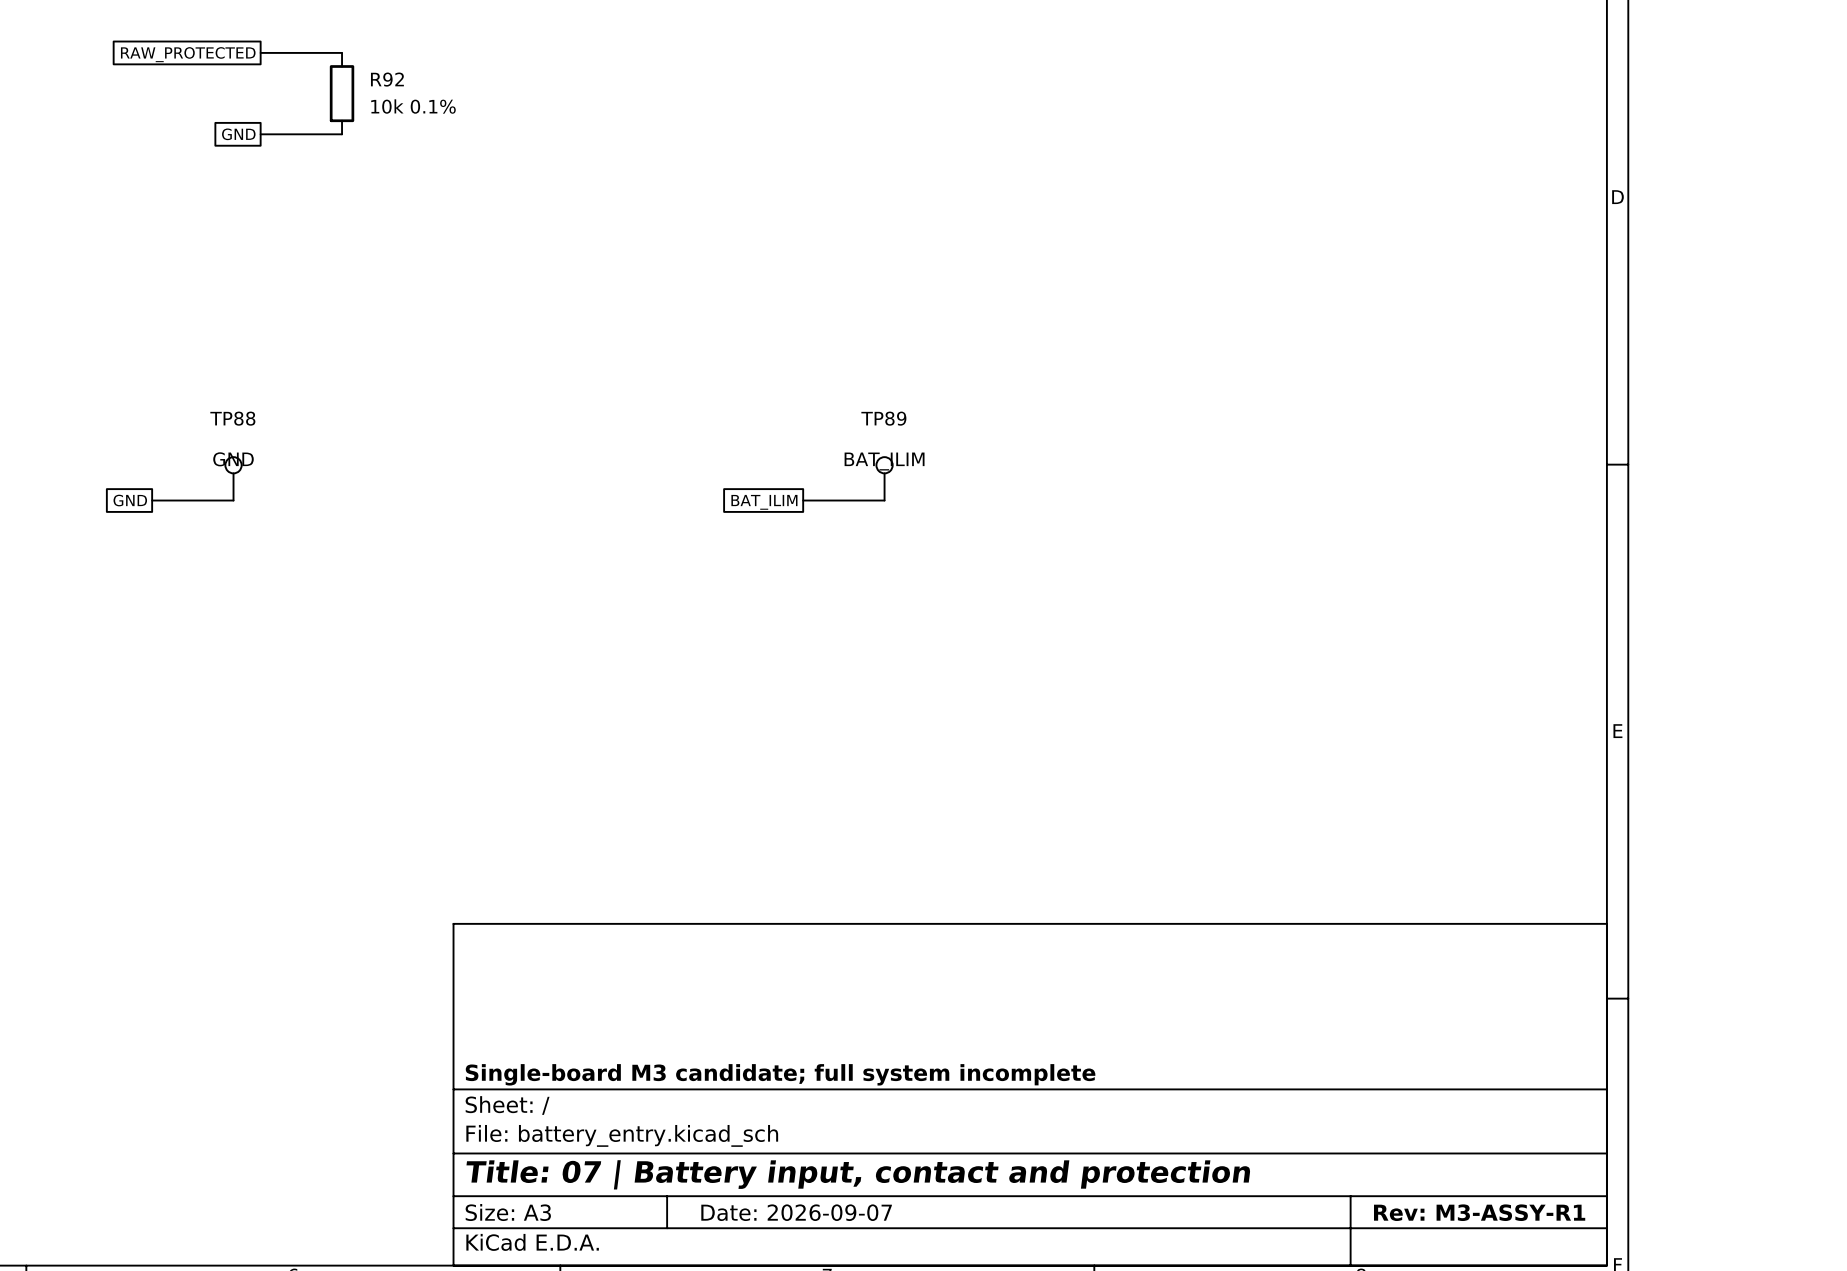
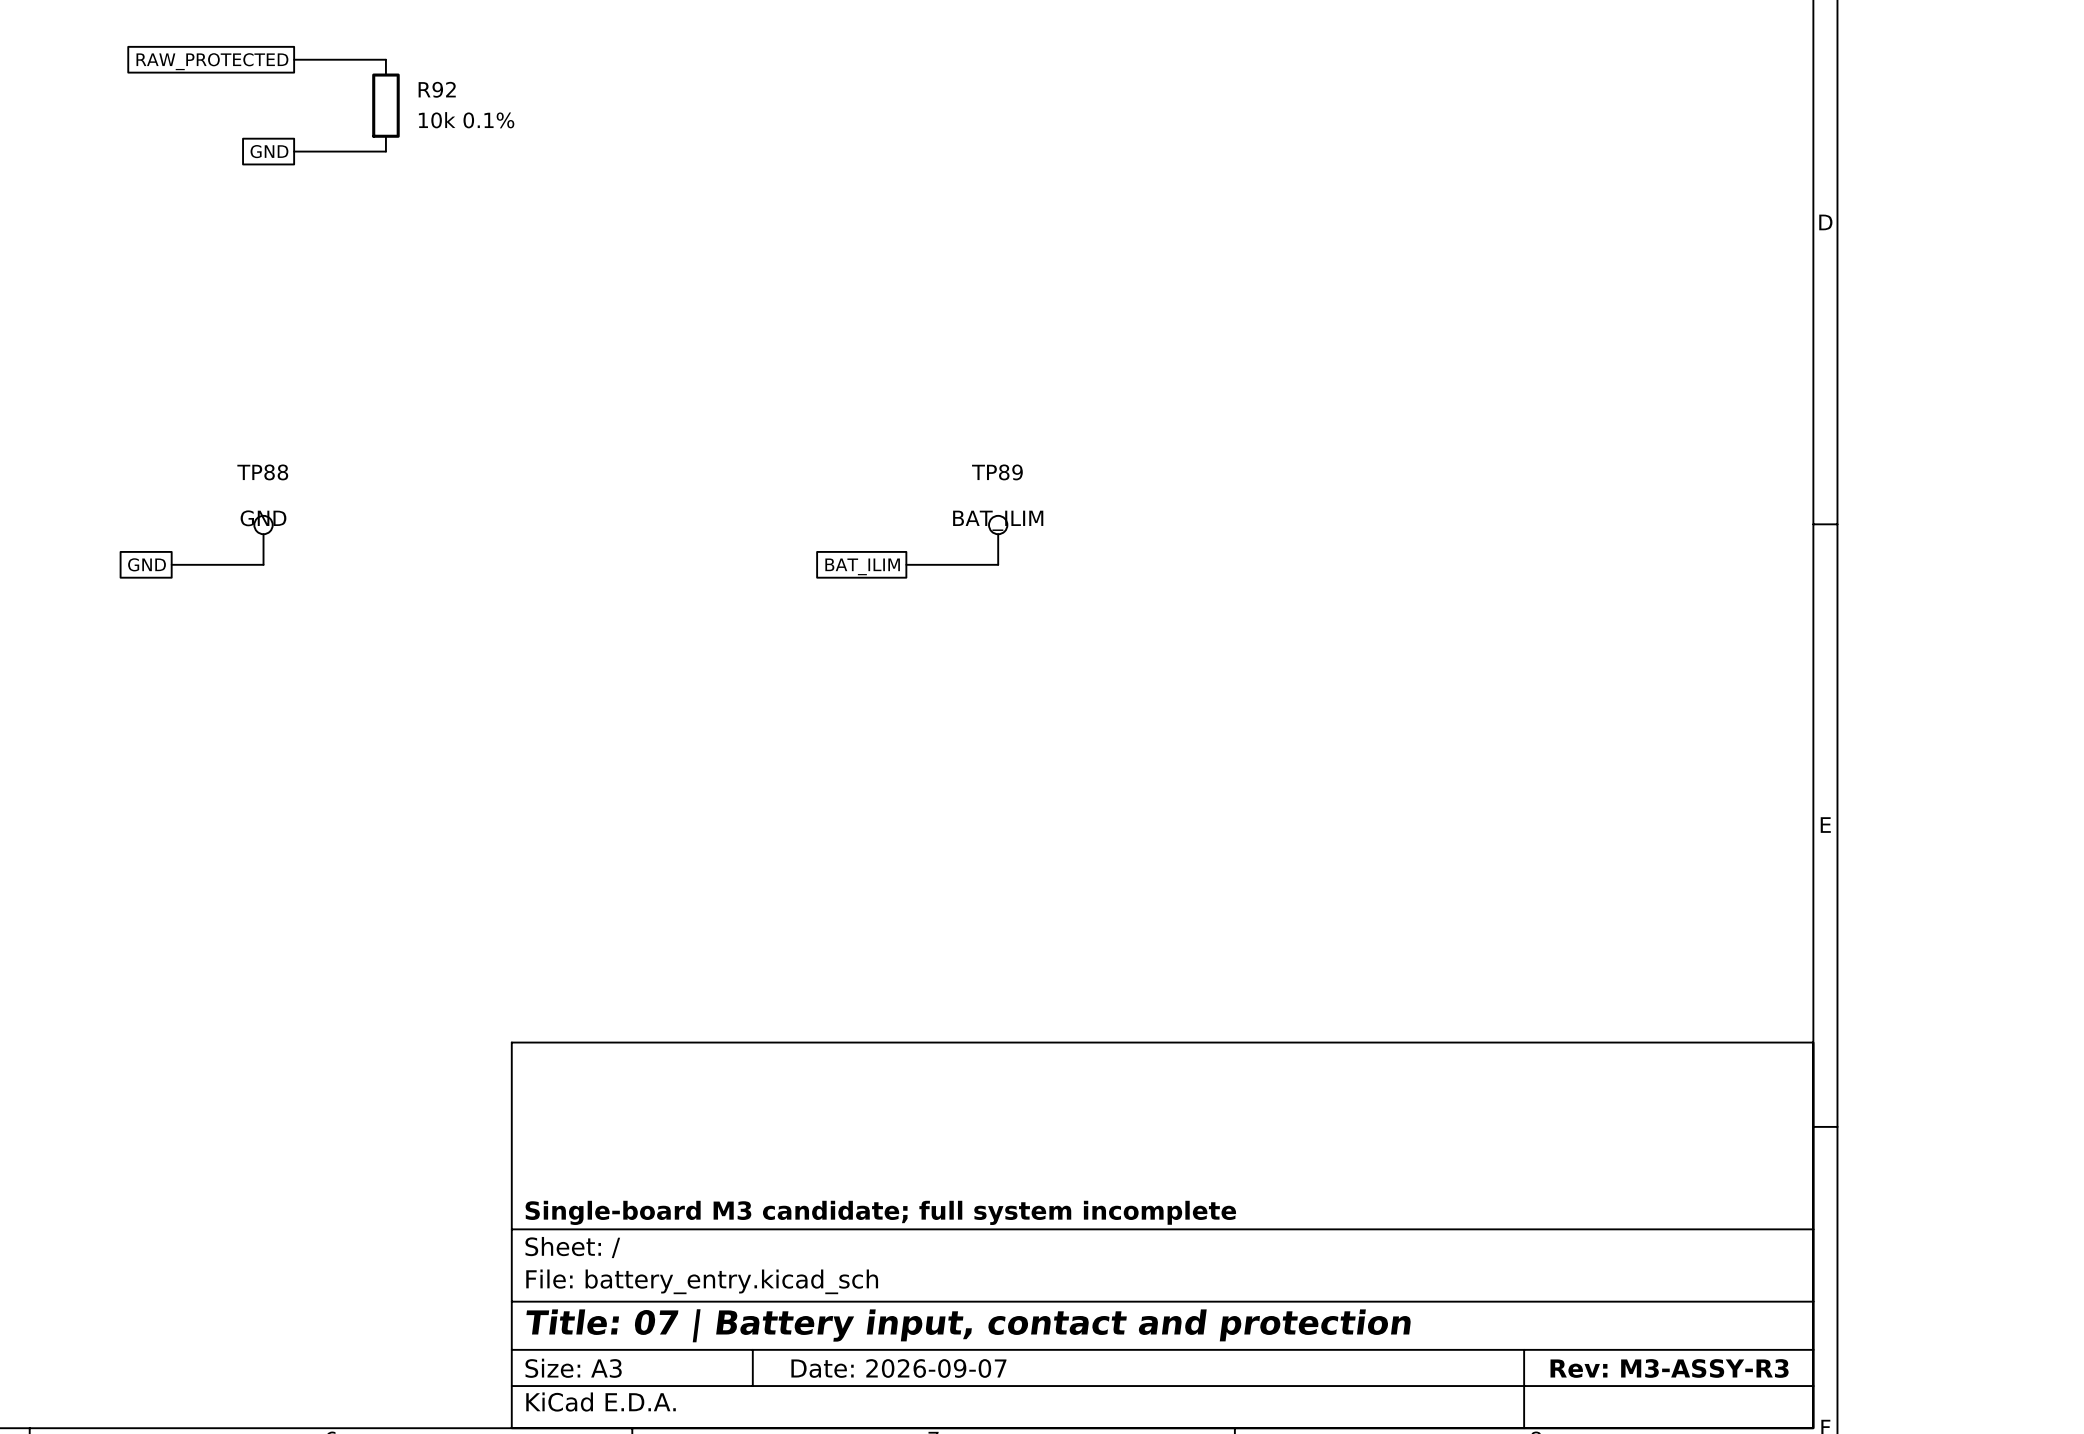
title block: Rev: M3-ASSY-R1 (1479, 1212) -> Rev: M3-ASSY-R3 (1669, 1368)

